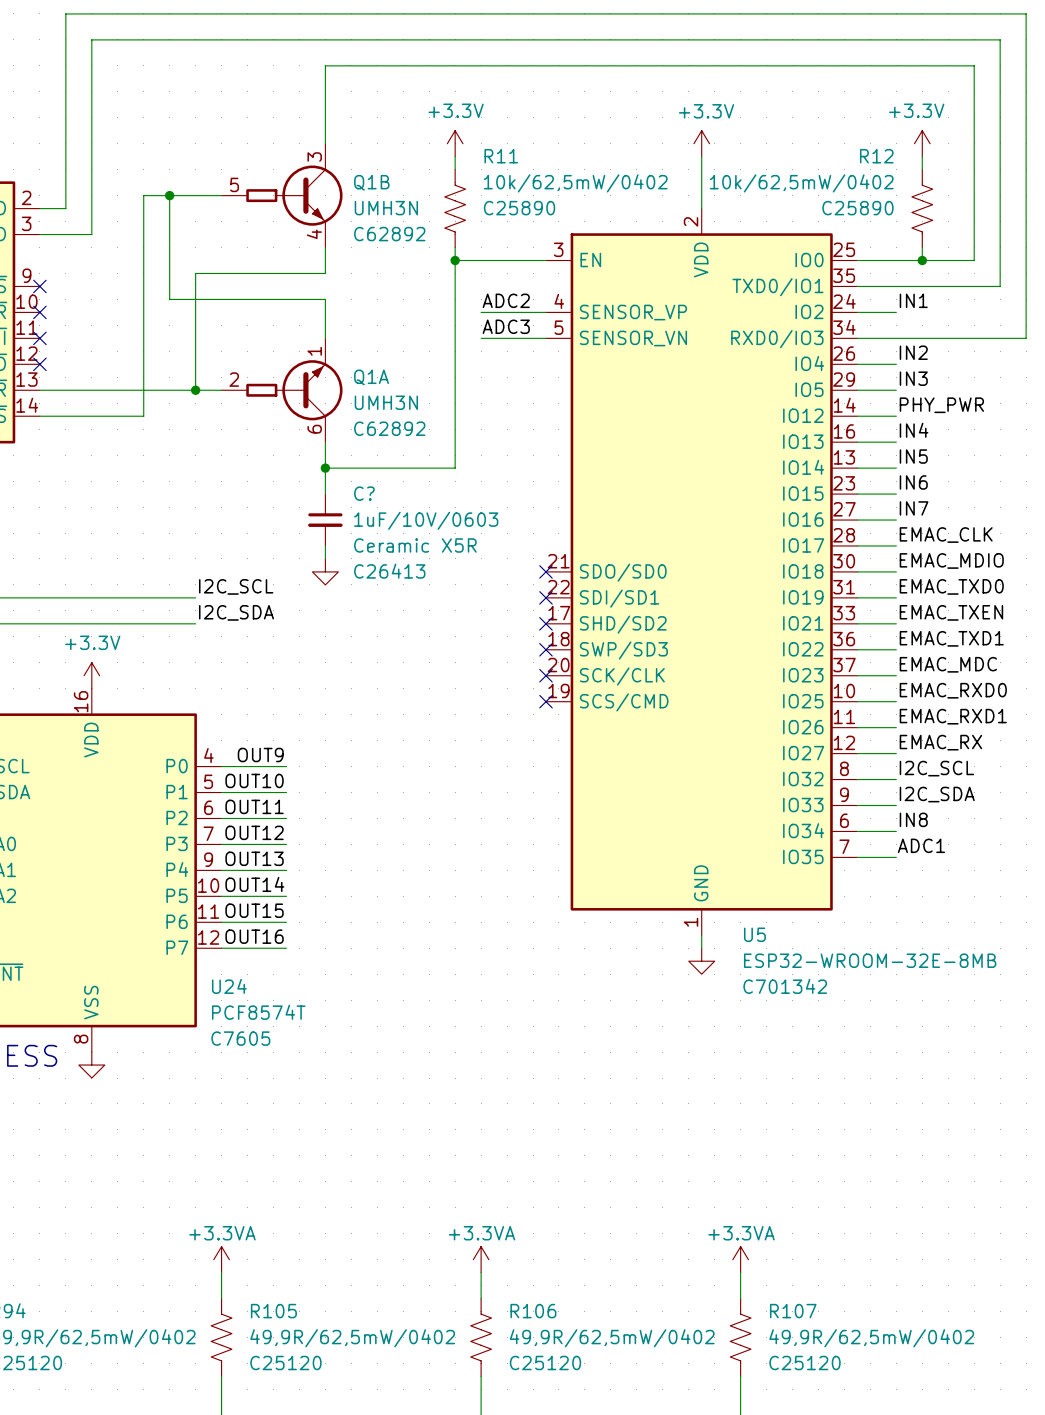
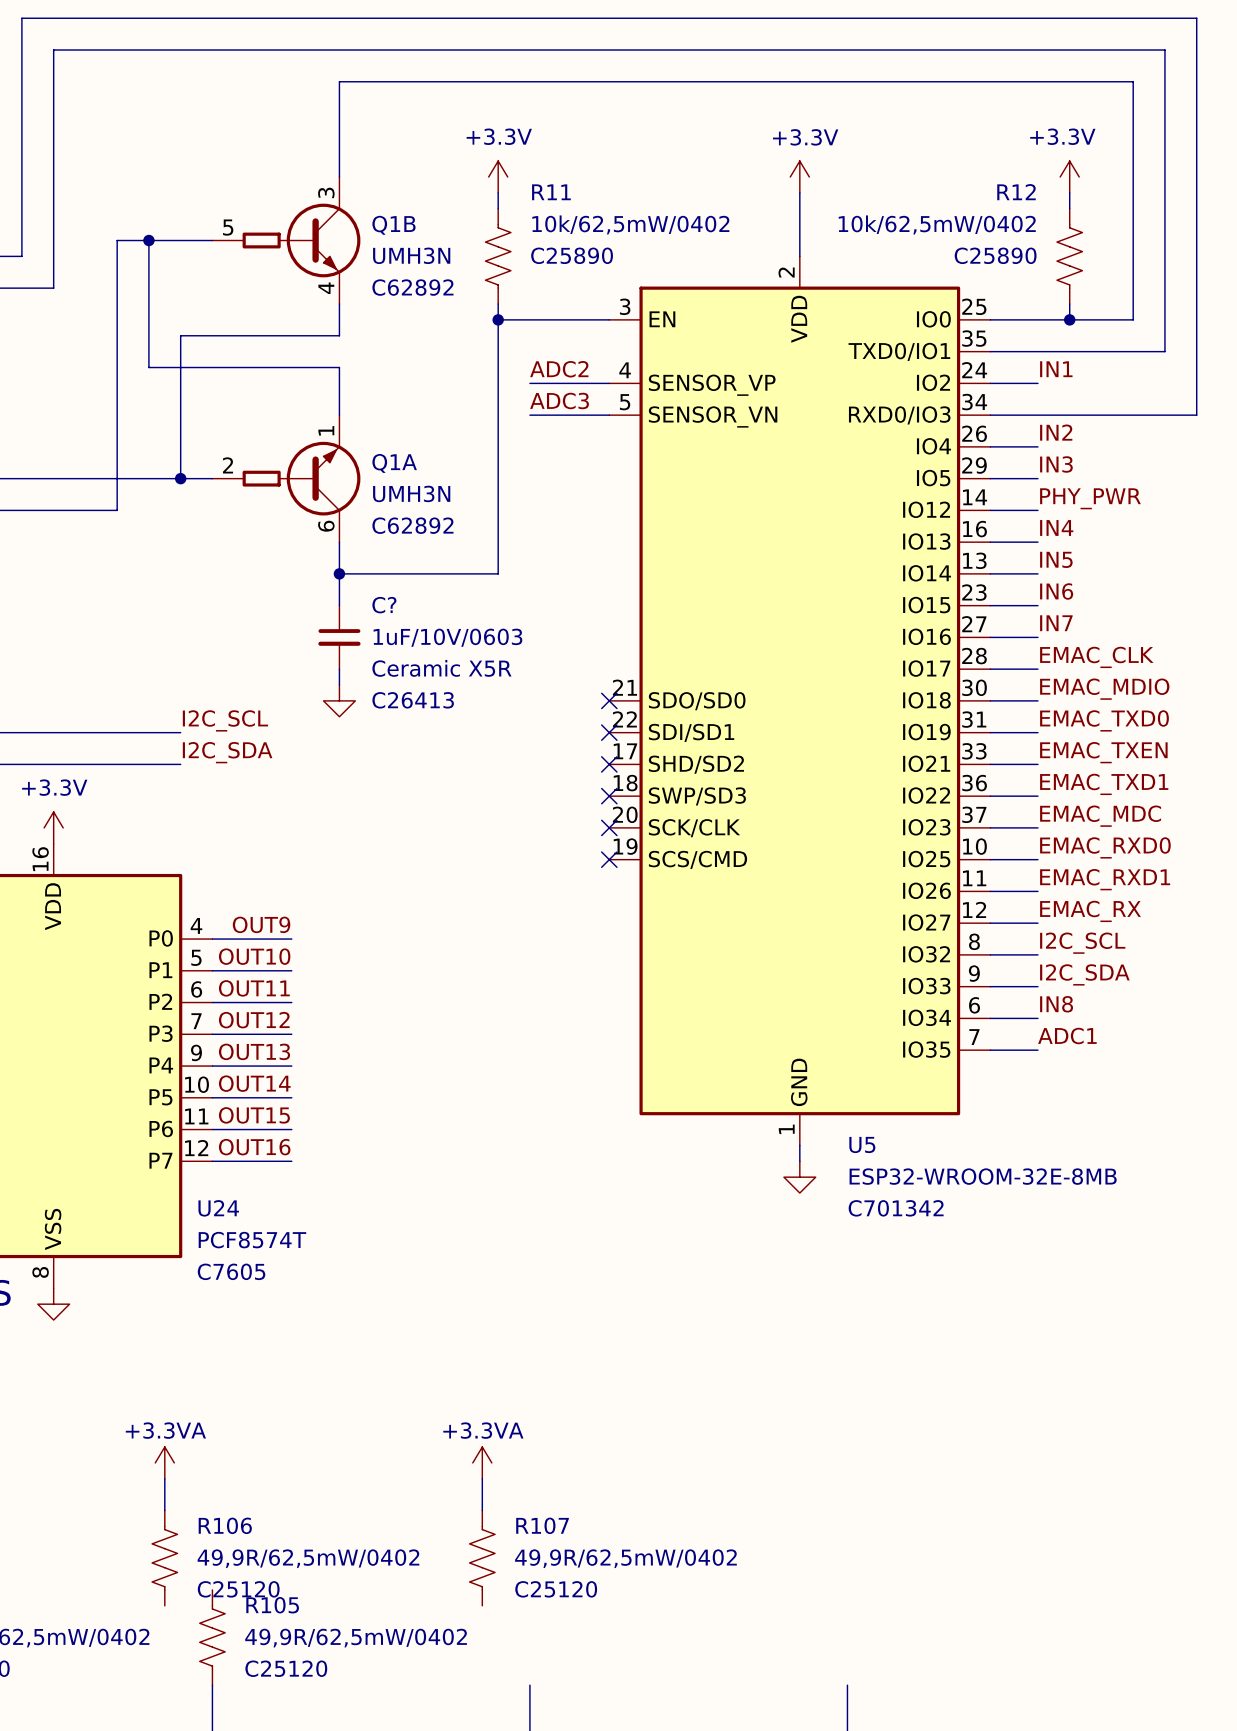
power symbol position: +3.3VA (221, 1259) -> +3.3VA (164, 1462)
power symbol position: +3.3VA (481, 1259) -> +3.3VA (482, 1462)
power symbol: +3.3VA (740, 1259) -> none
wire: (221, 1272) (221, 1298) -> (164, 1478) (164, 1510)
wire: (481, 1272) (481, 1298) -> (482, 1478) (482, 1510)
wire: (740, 1272) (740, 1298) -> none
R106 position: (481, 1337) -> (164, 1558)
R107 position: (740, 1337) -> (482, 1558)

